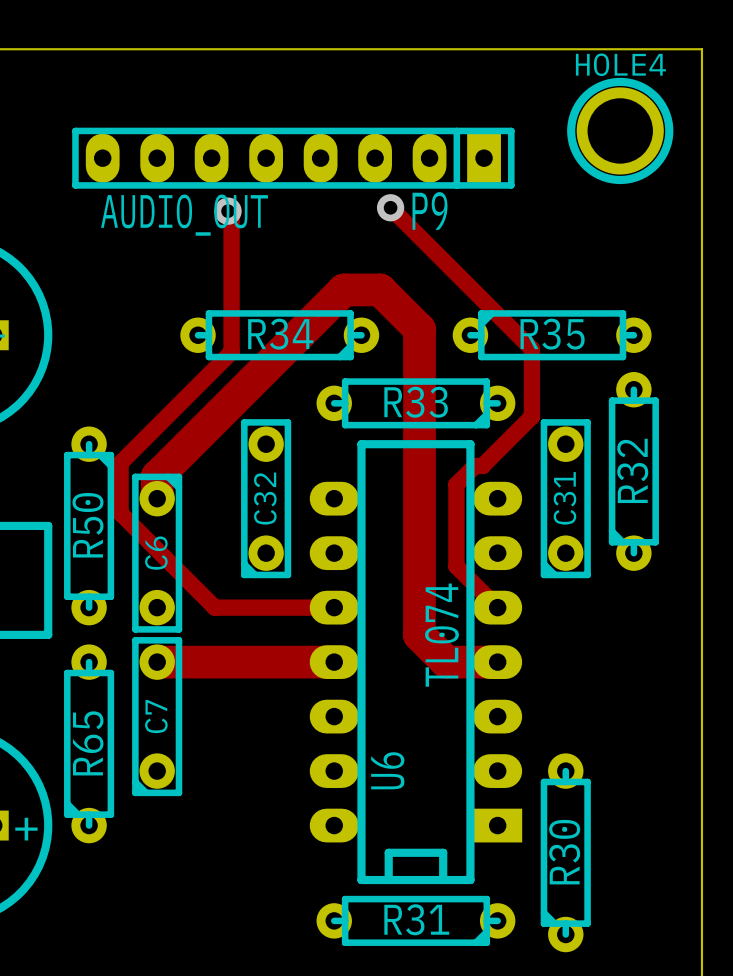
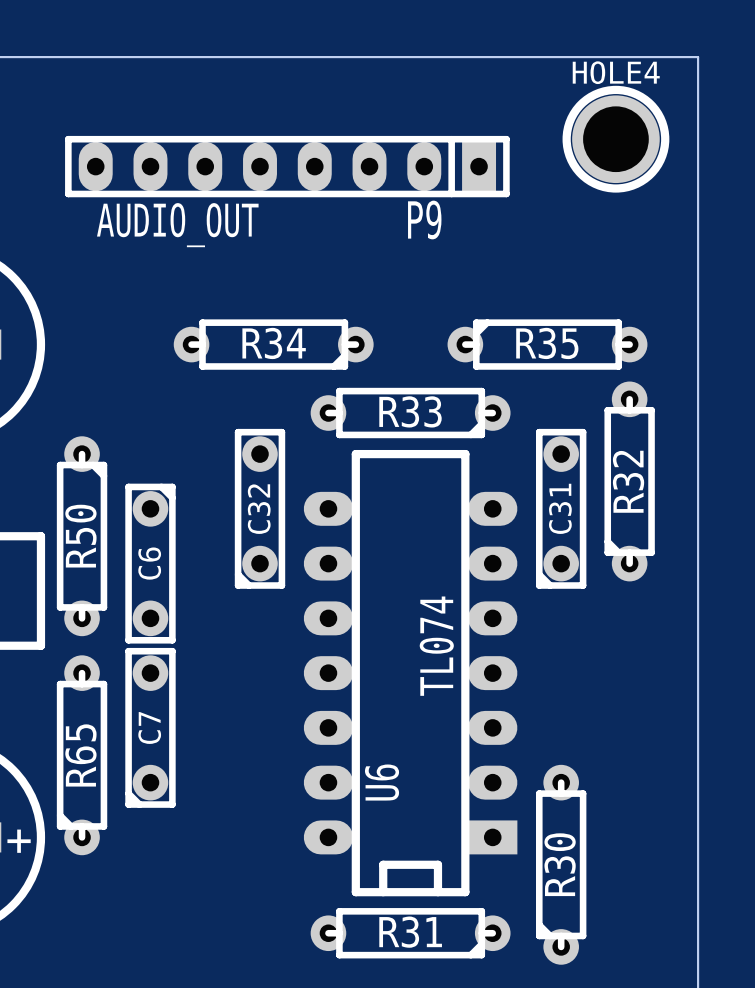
track: (390, 207) (531, 349) (531, 416) (482, 465) (475, 465) (456, 484) (456, 566) (497, 607) -> none
via: (390, 207) -> none
track: (228, 211) (231, 214) (231, 352) (120, 463) (120, 513) (214, 607) (334, 607) -> none
via: (228, 211) -> none
track: (157, 498) (157, 476) (343, 289) (380, 289) (419, 329) (419, 635) (446, 662) (497, 662) -> none
track: (157, 662) (334, 662) -> none

